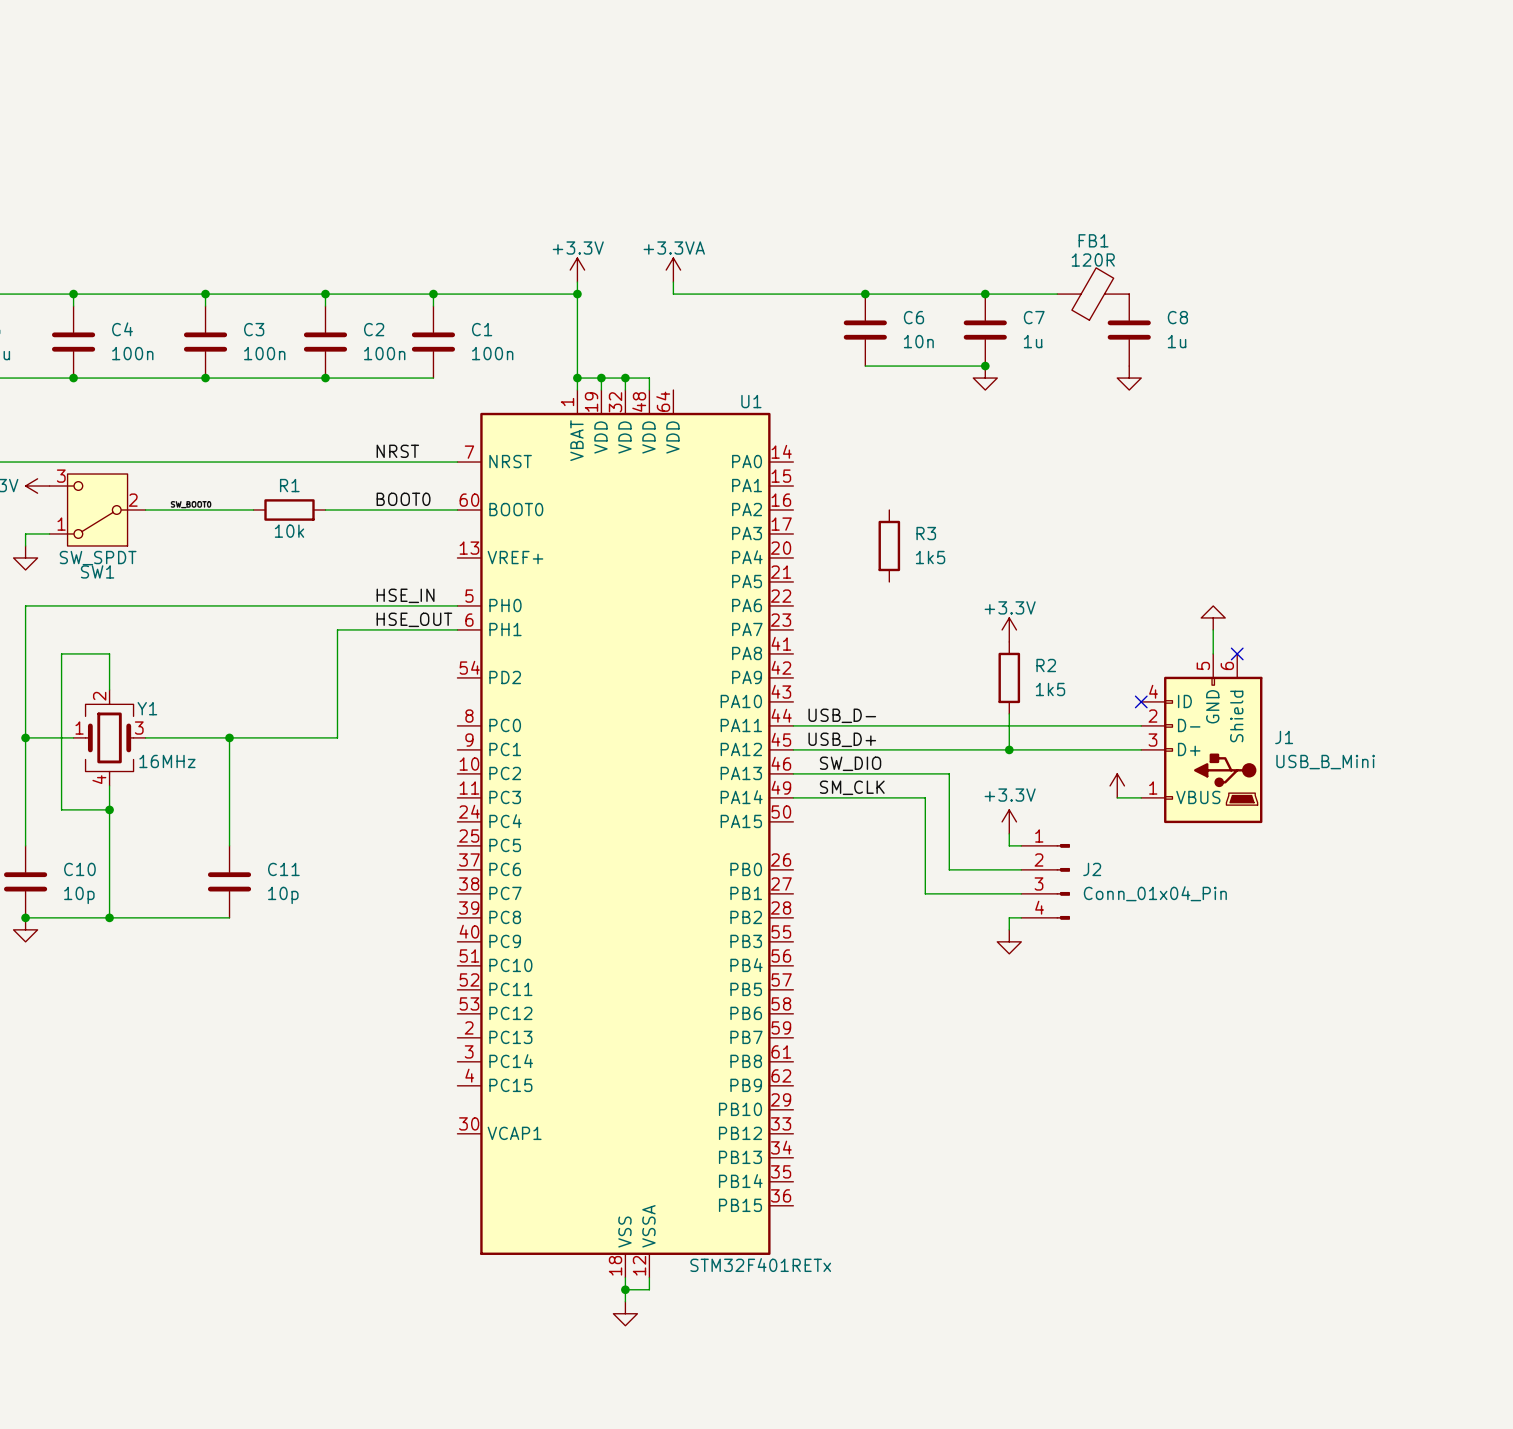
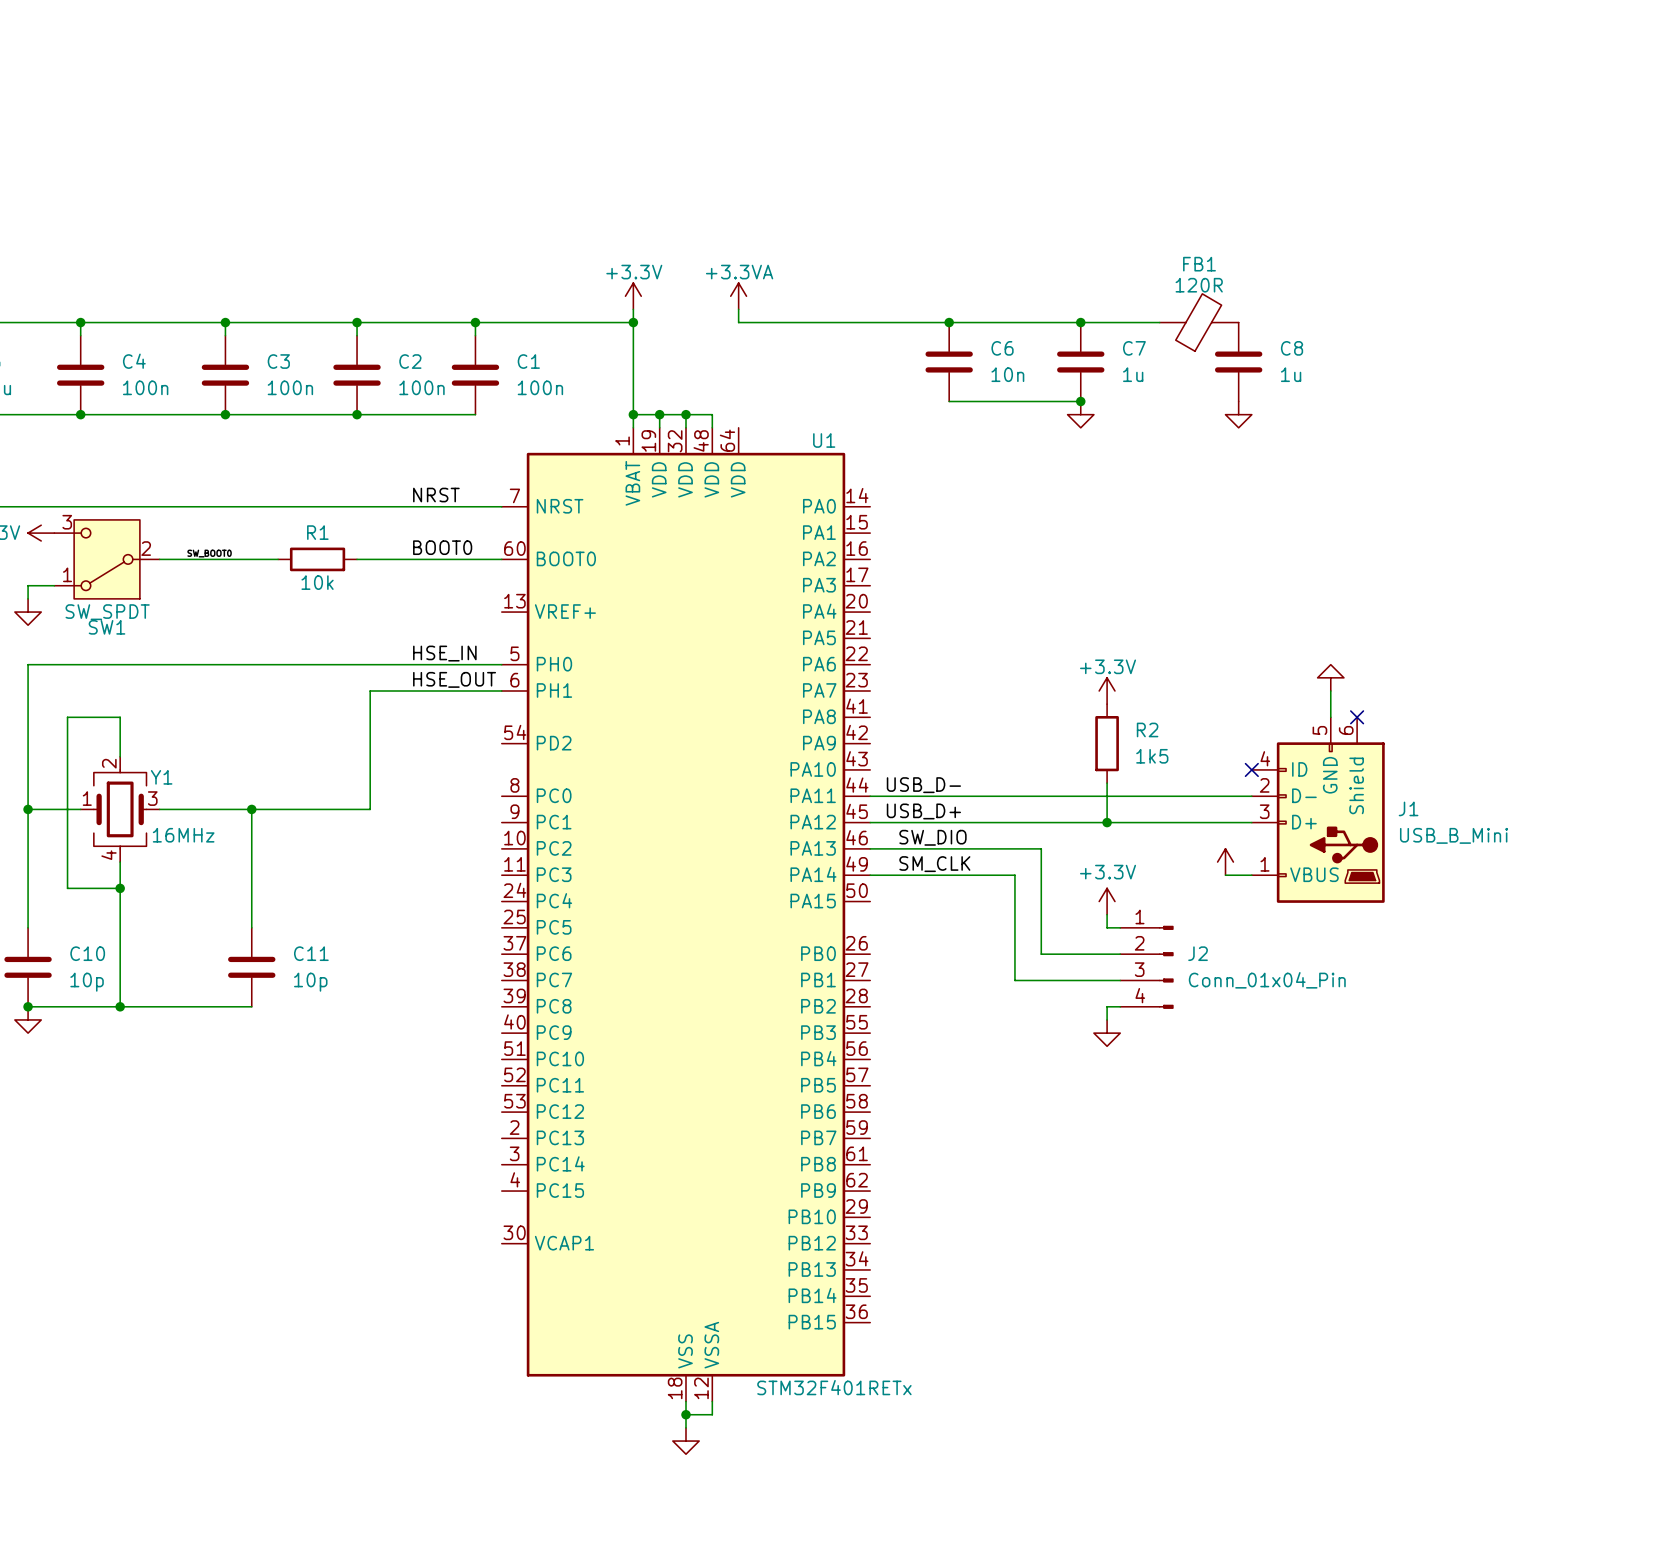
R3: 1k5 (889, 545) -> none

